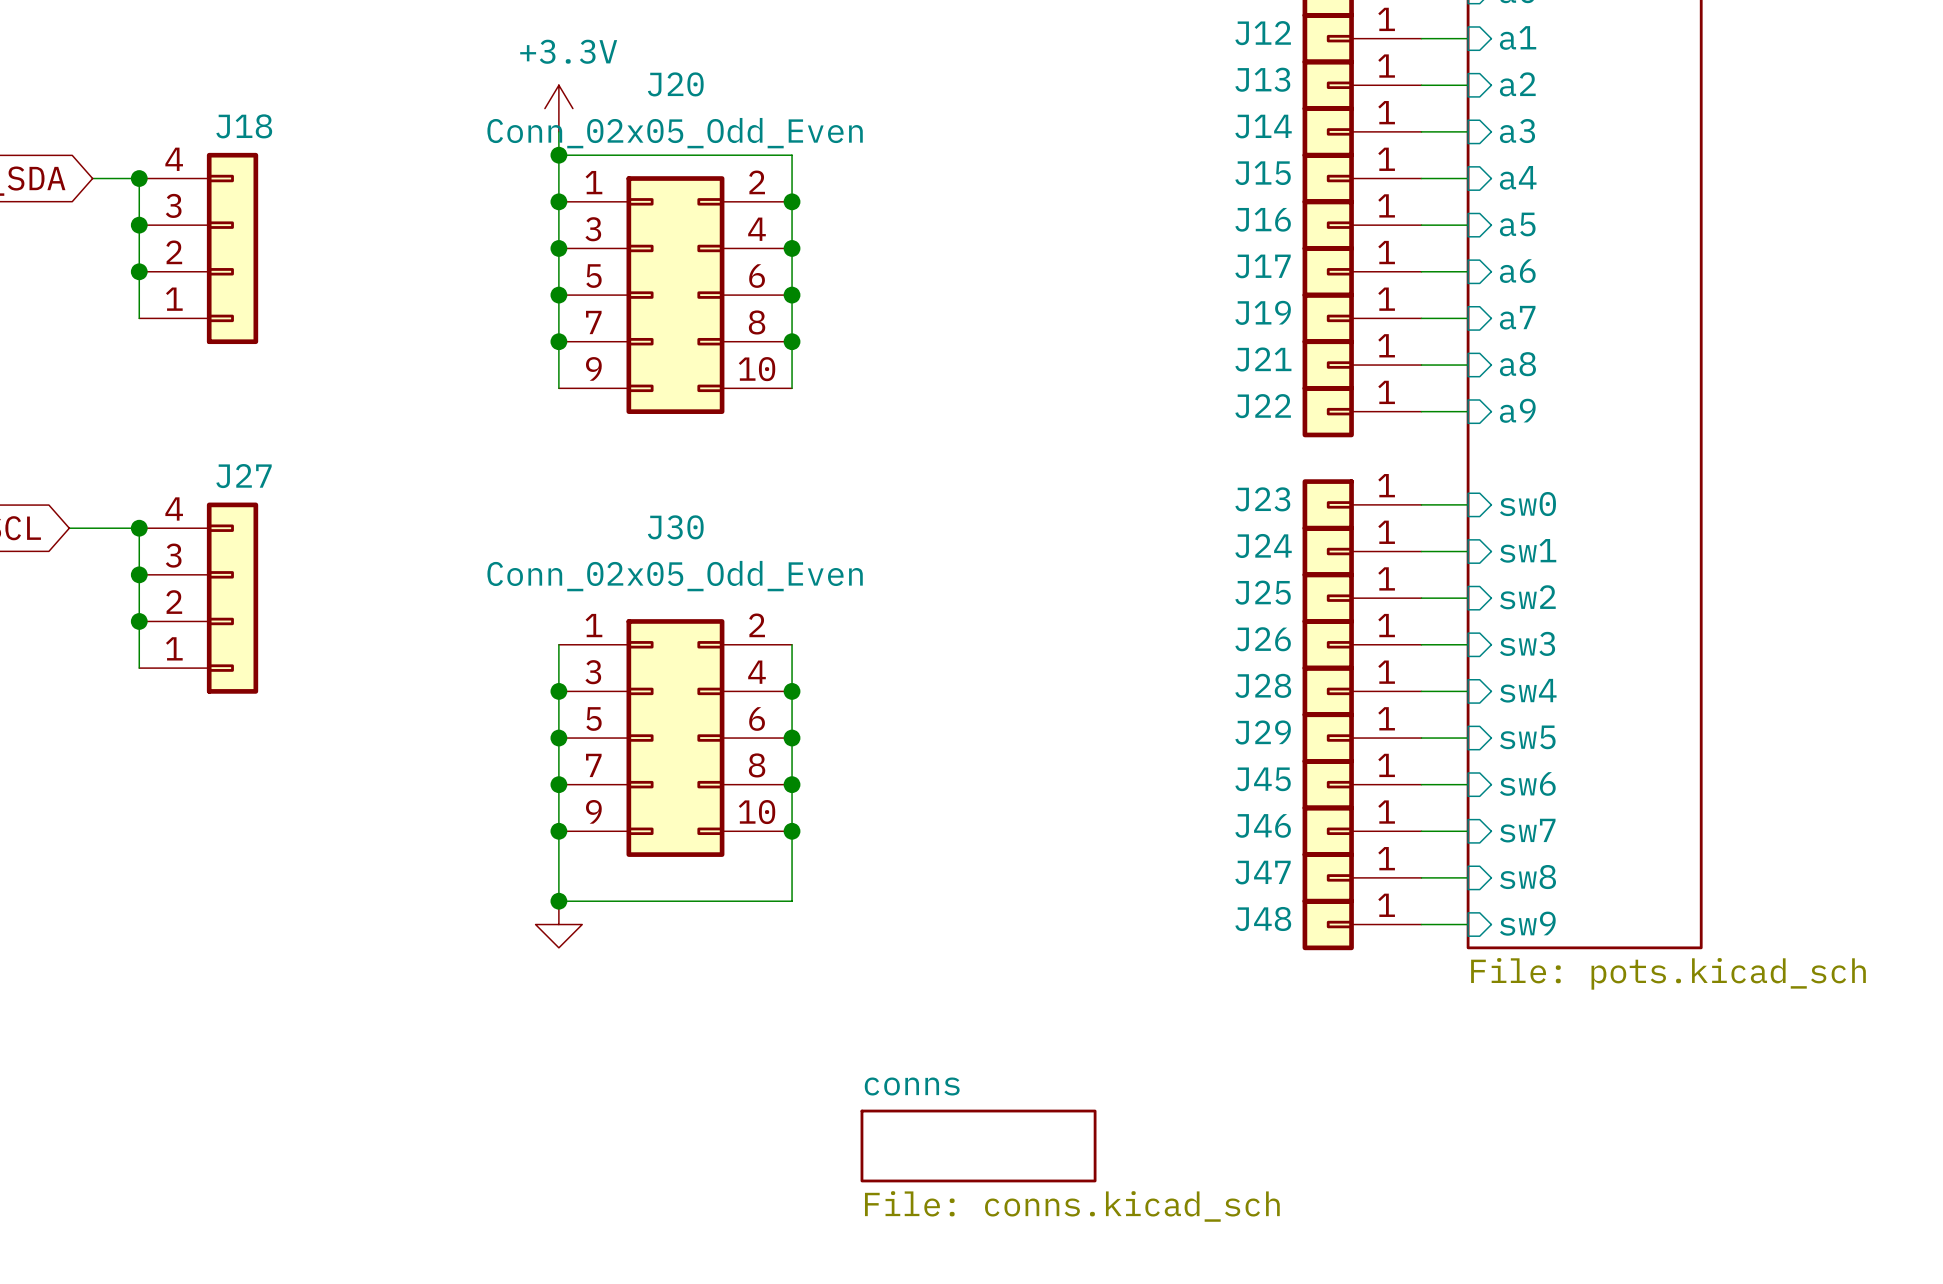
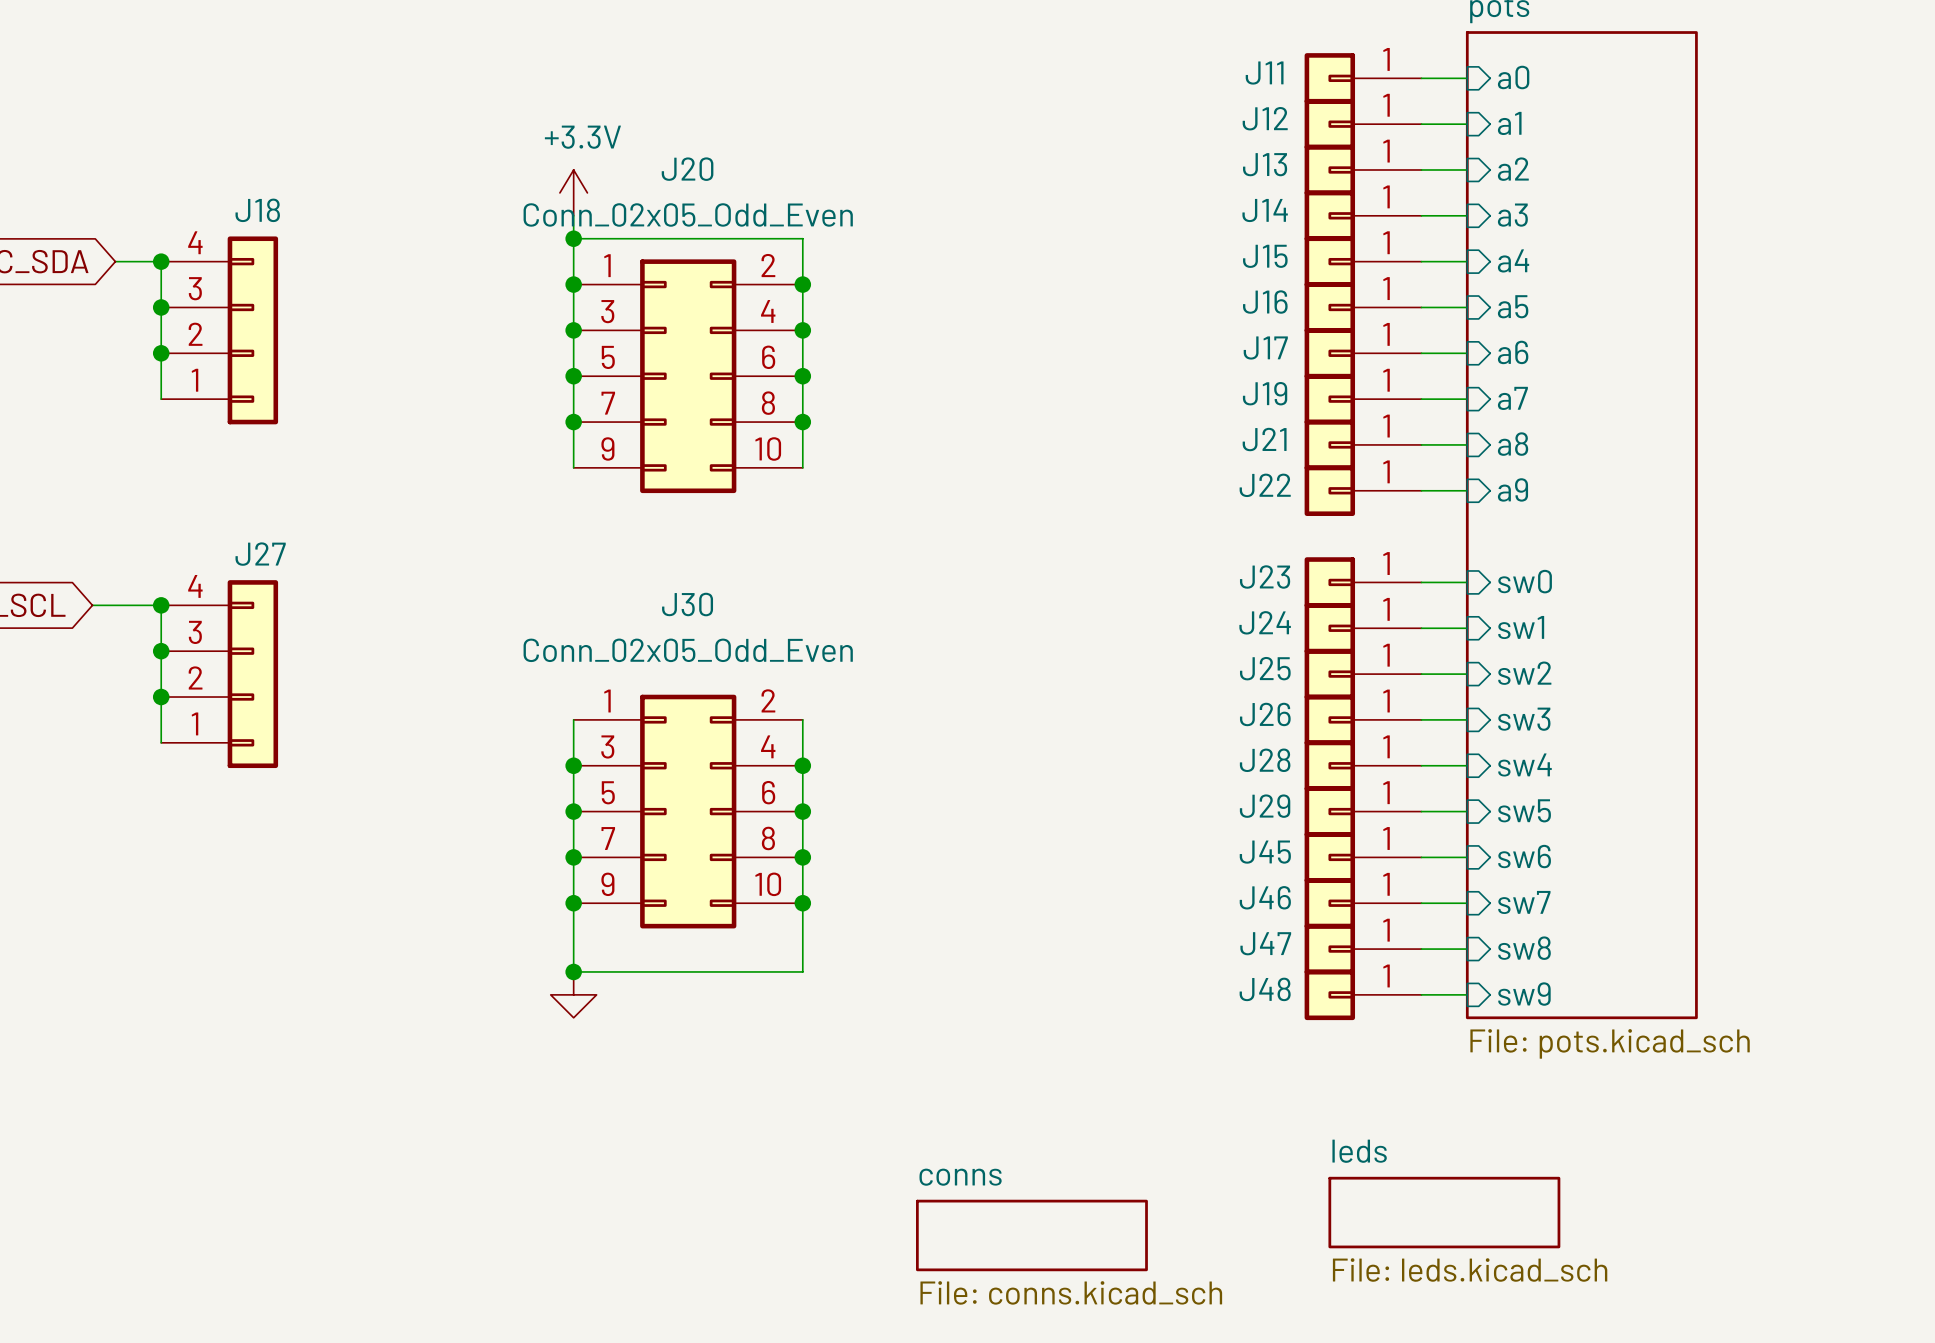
sheet conns position: (978, 1146) -> (1031, 1235)
sheet leds: none -> File: leds.kicad_sch (1444, 1212)

